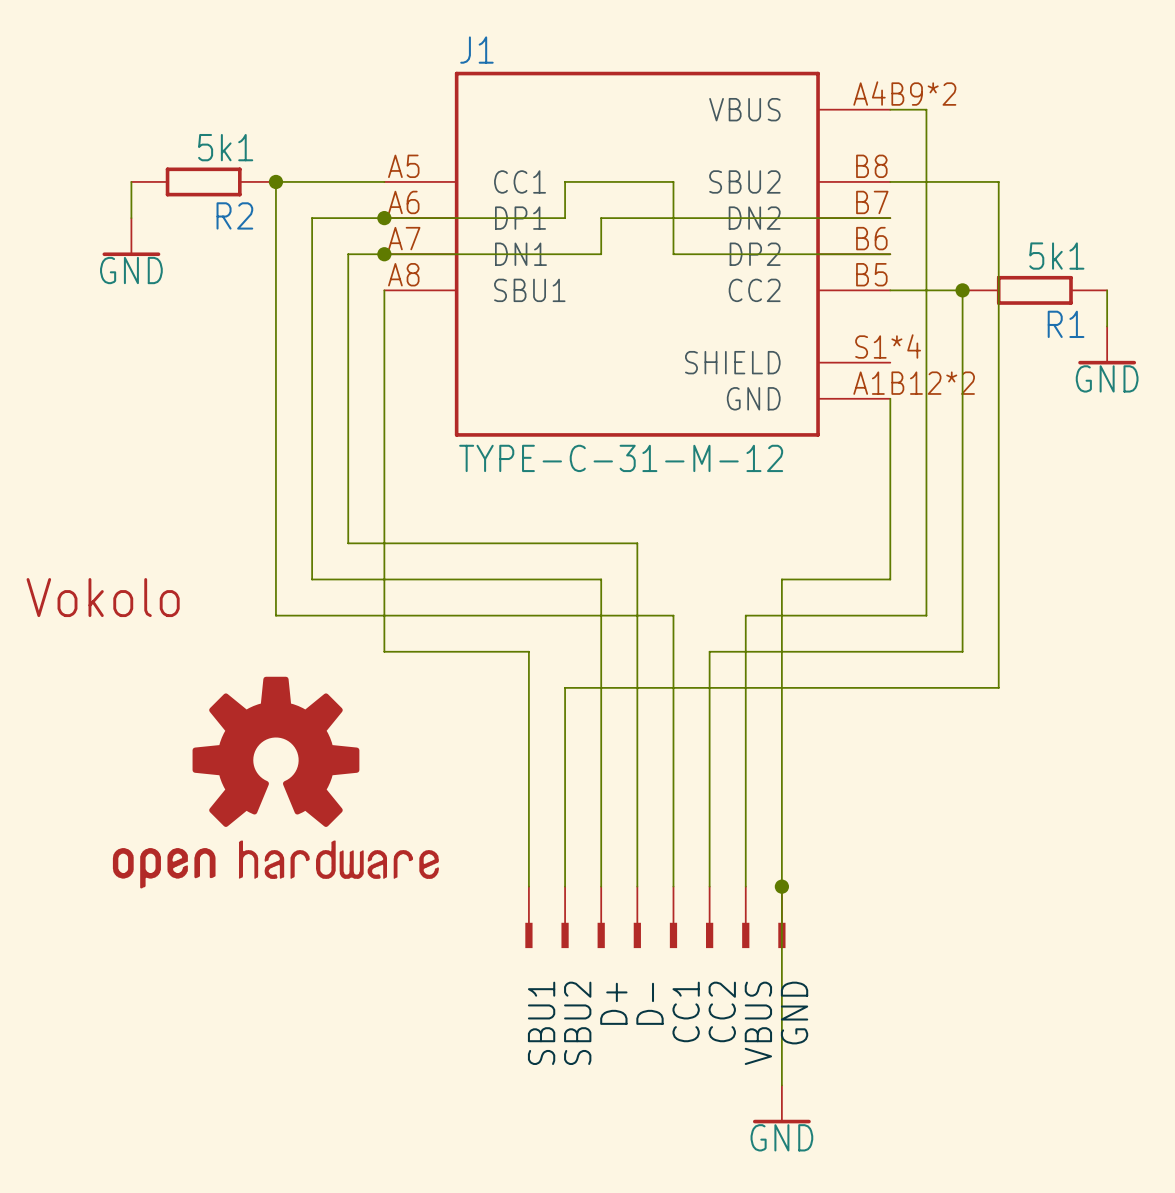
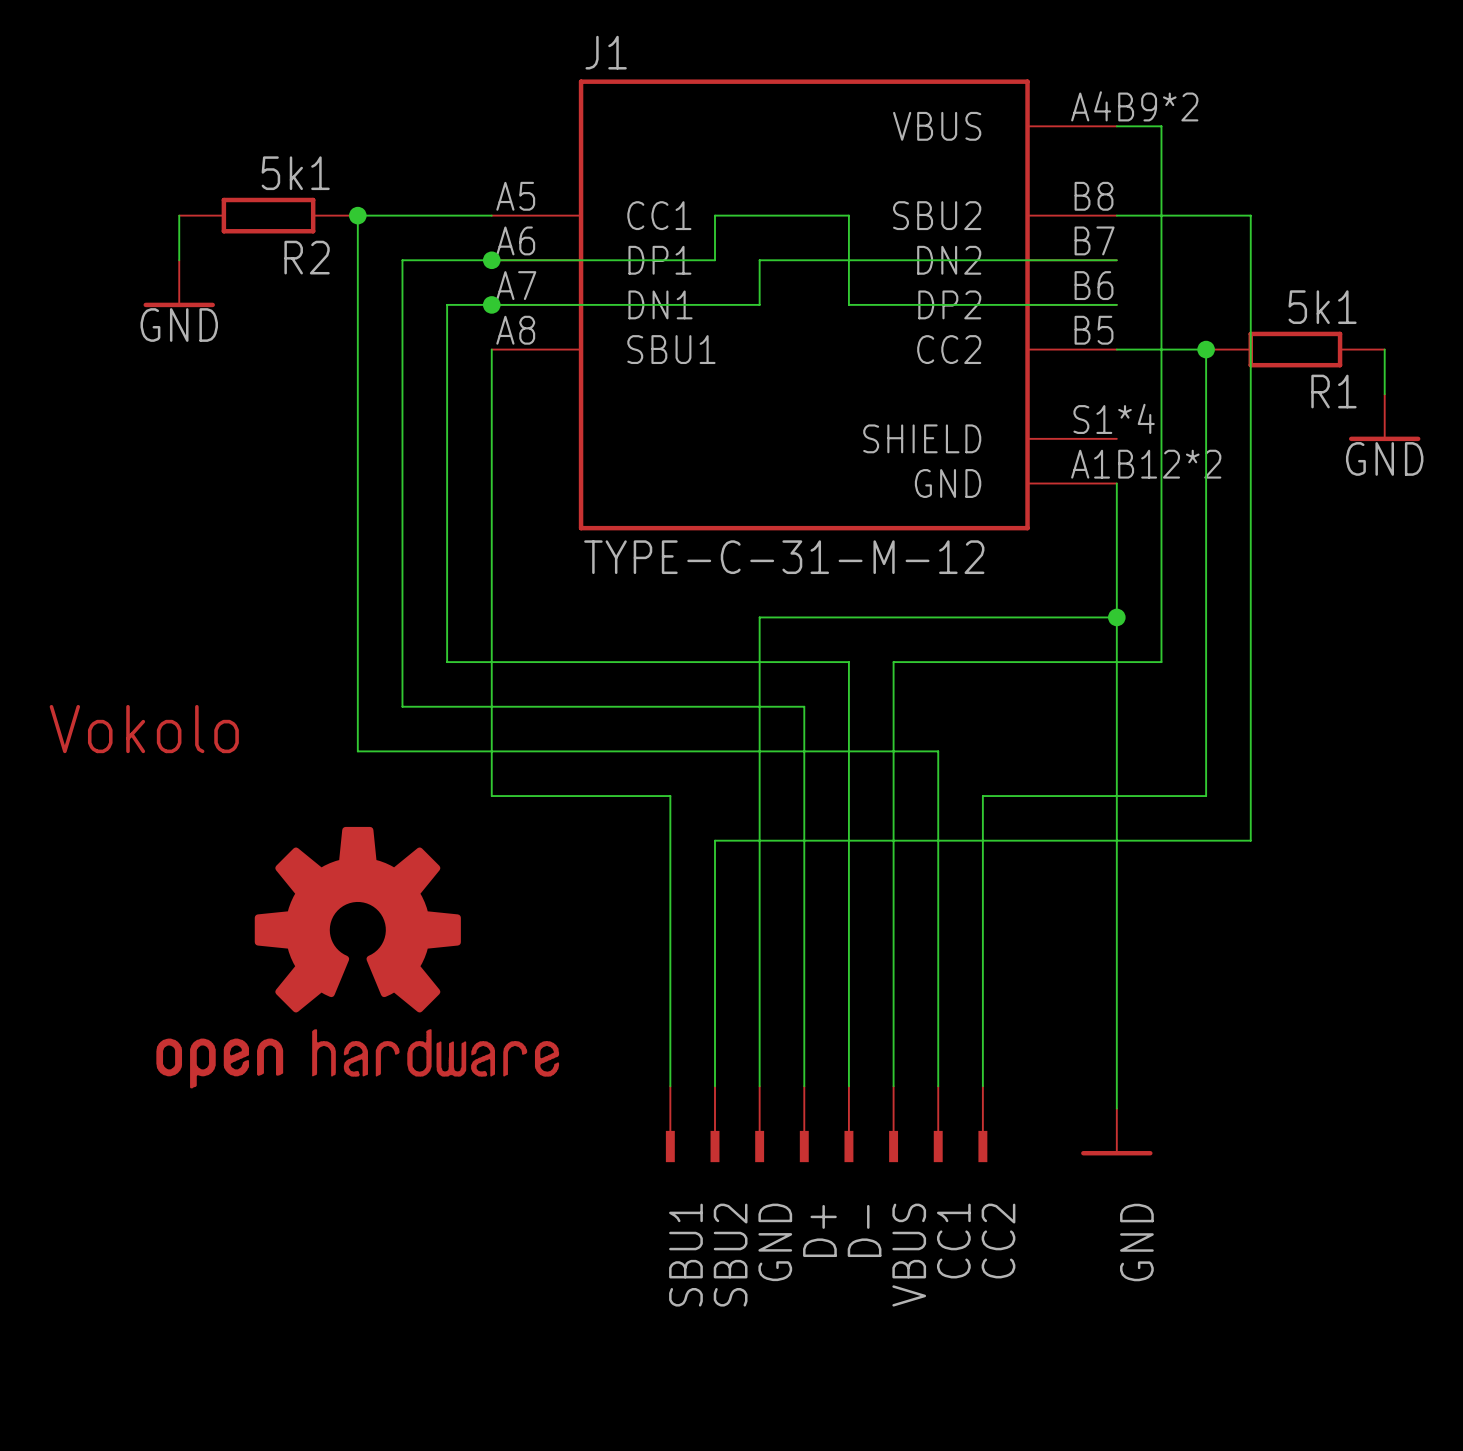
wire: none -> (1116, 617) (759, 617) (759, 706) (804, 706)
junction: none -> (1116, 617)
wire: (637, 543) (637, 579) -> (804, 662) (848, 662) (848, 751) (938, 751)
wire: (926, 543) (926, 615) (745, 615) -> (1161, 662) (893, 662) (893, 796)
wire: (890, 579) (781, 579) (781, 651) (709, 651) -> (1116, 706) (1116, 1108)
wire: (781, 886) (781, 1085) -> none
junction: (781, 886) -> none
label: D+ (613, 1003) -> GND (775, 1242)
label: D- (649, 1003) -> D+ (819, 1230)
label: CC1 (686, 1011) -> D- (864, 1230)
label: CC2 (722, 1011) -> VBUS (909, 1255)
label: GND (794, 1013) -> CC2 (998, 1241)
label: VBUS (758, 1023) -> CC1 (953, 1241)
power symbol position: GND (781, 1104) -> GND (1116, 1132)
power symbol text rotation: 0° (781, 1137) -> 90° counterclockwise (1136, 1242)

